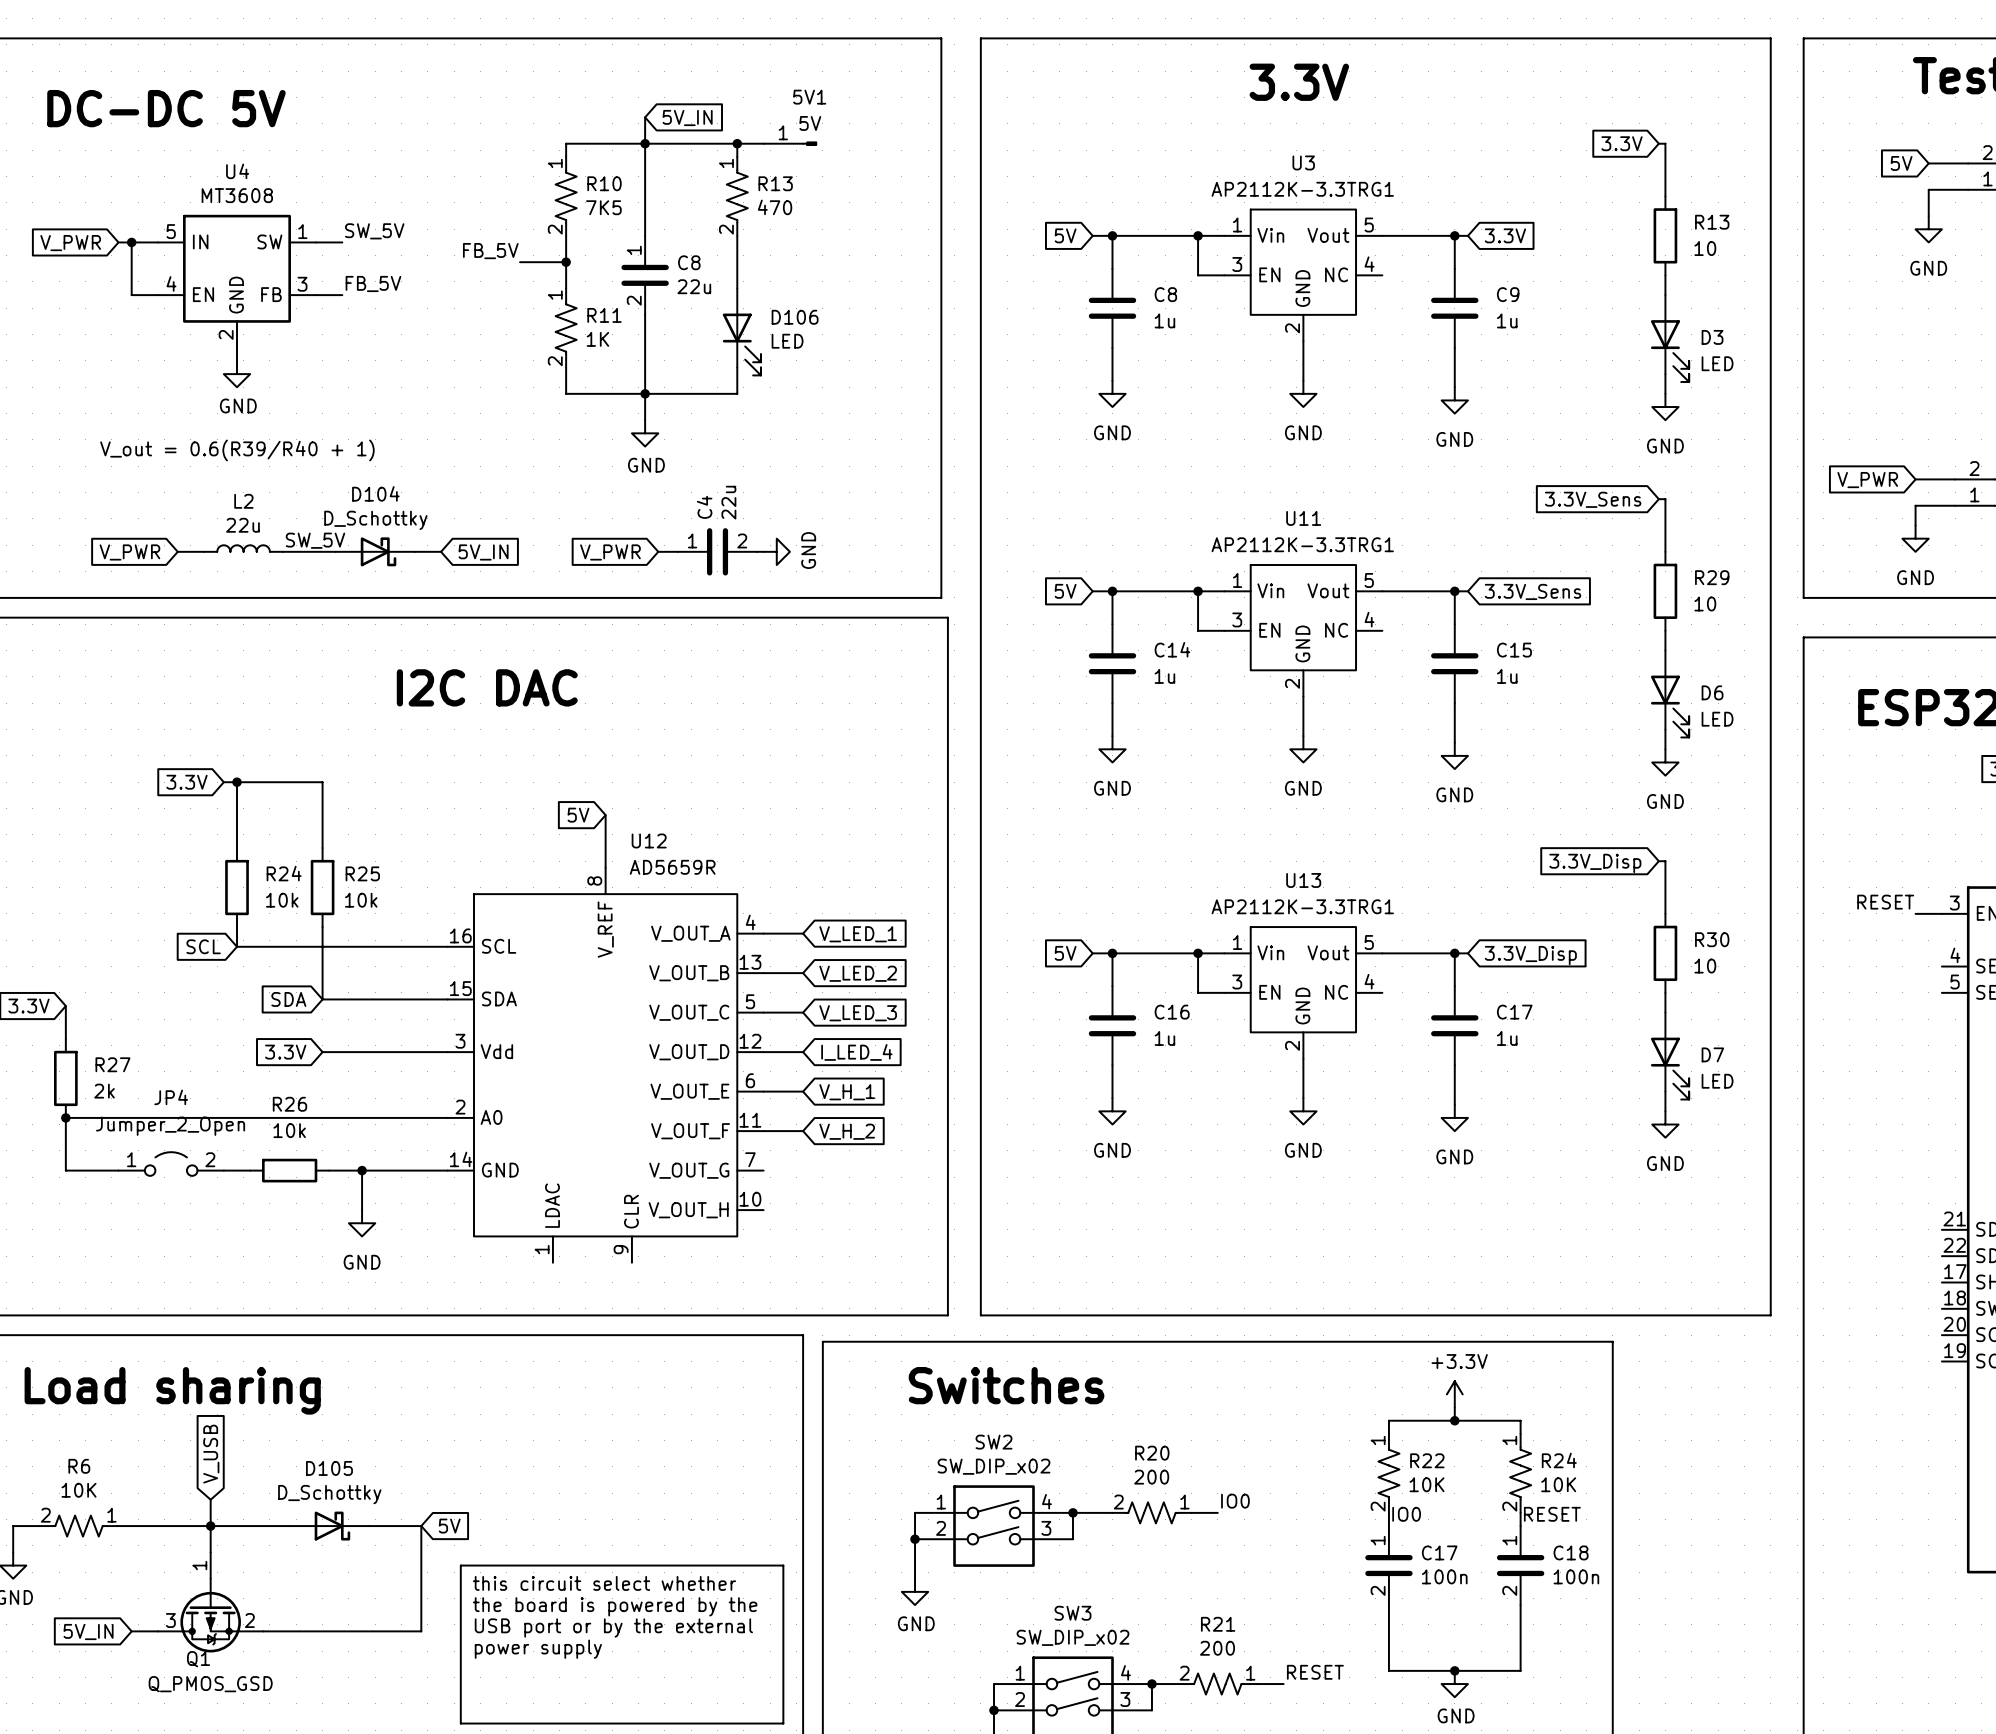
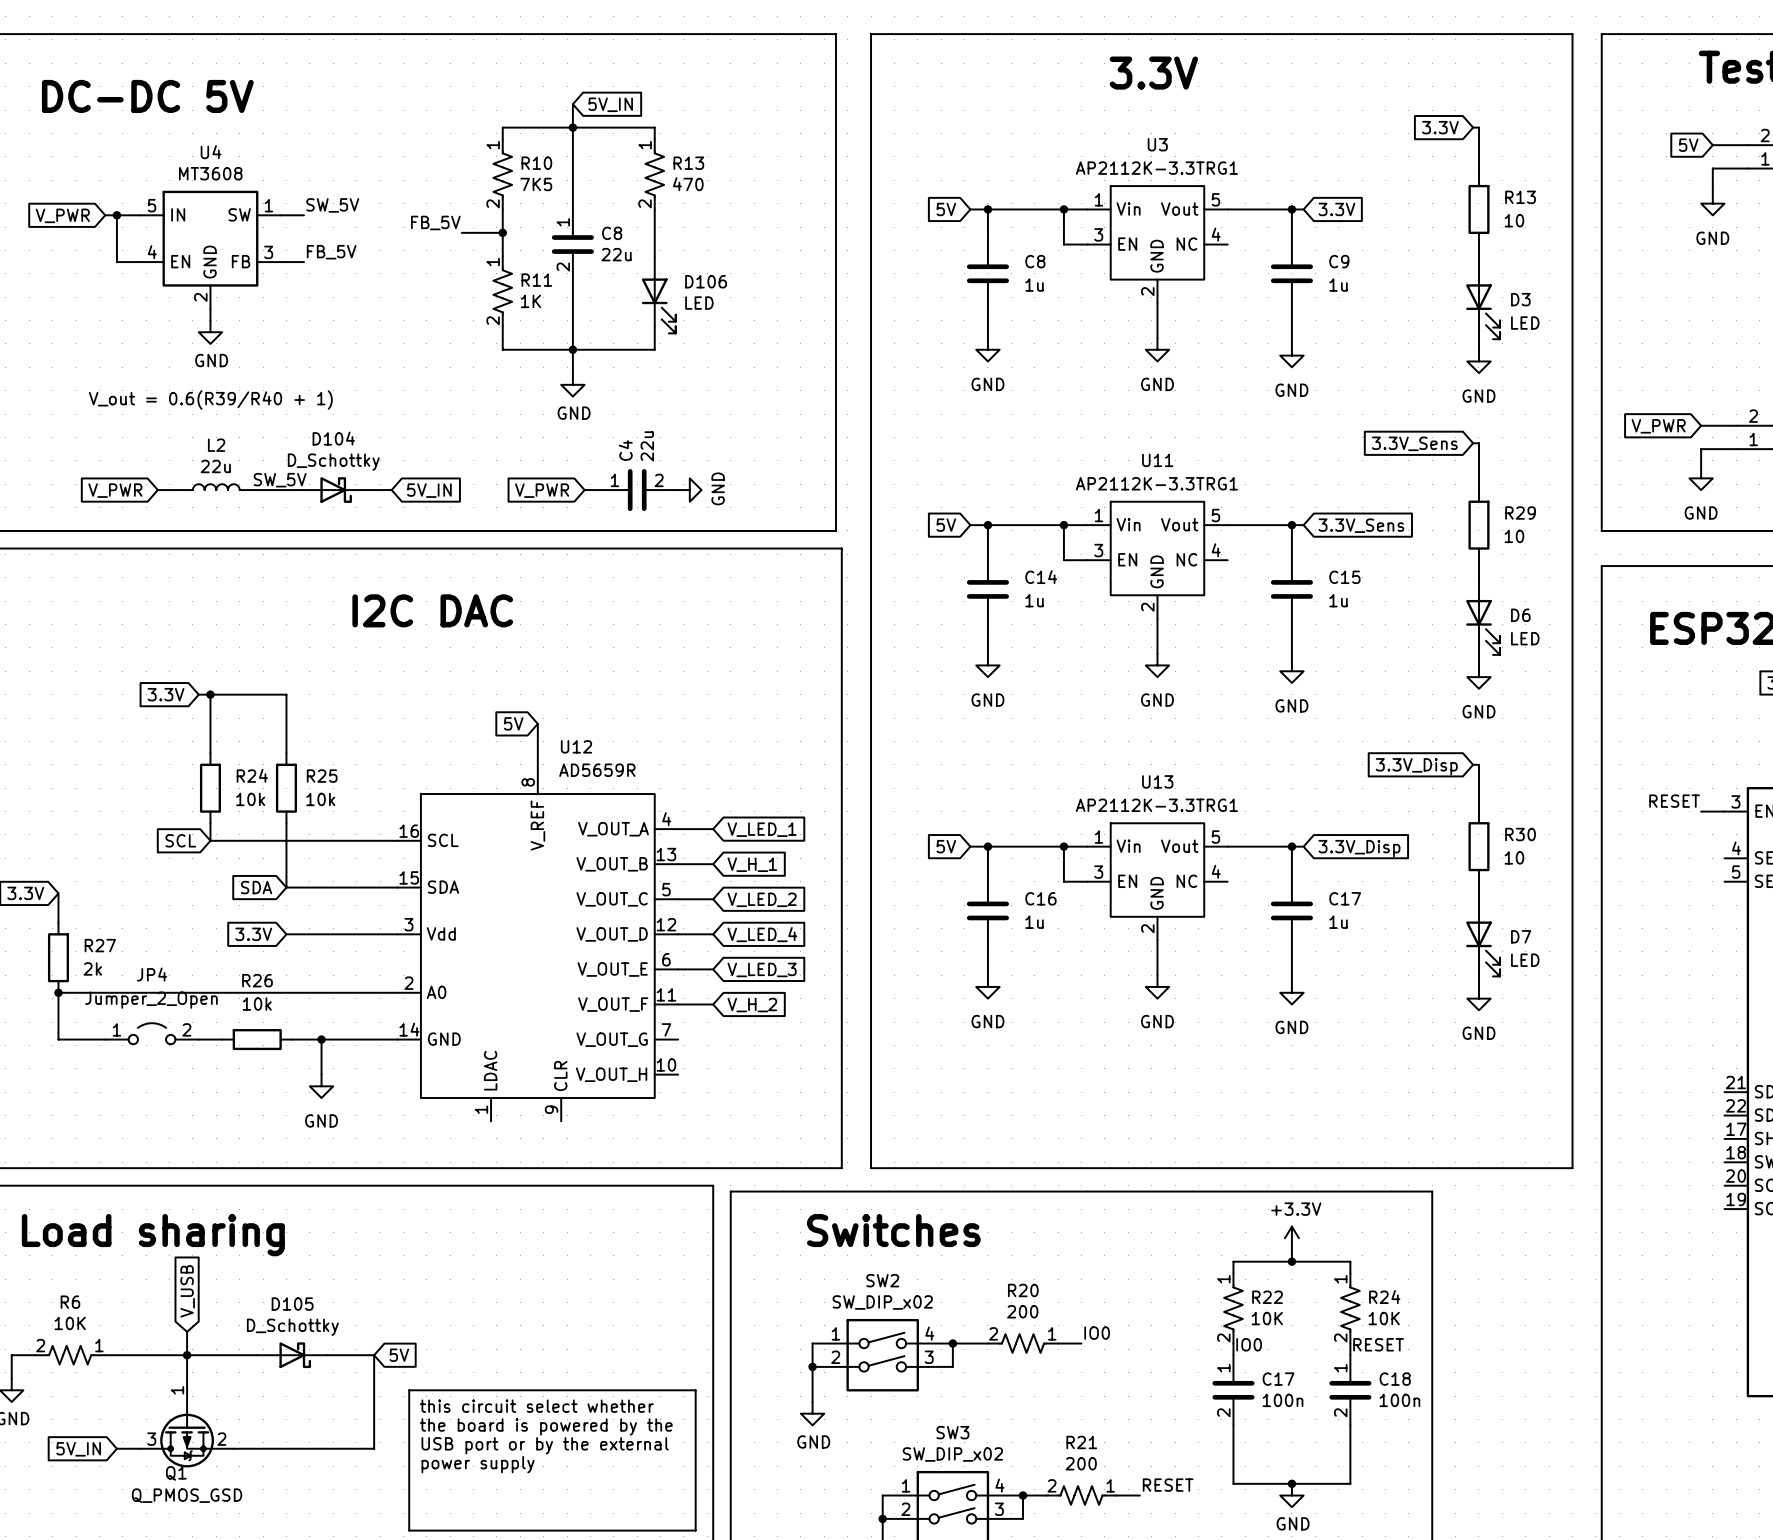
wire: (737, 143) (763, 143) -> none
junction: (737, 143) -> none
5V1: 5V (790, 143) -> none
global label: V_LED_2 (858, 973) -> V_H_1 (752, 864)
global label: V_LED_3 (858, 1013) -> V_LED_2 (762, 899)
global label: I_LED_4 (856, 1052) -> V_LED_4 (762, 934)
global label: V_H_1 (847, 1092) -> V_LED_3 (762, 969)

